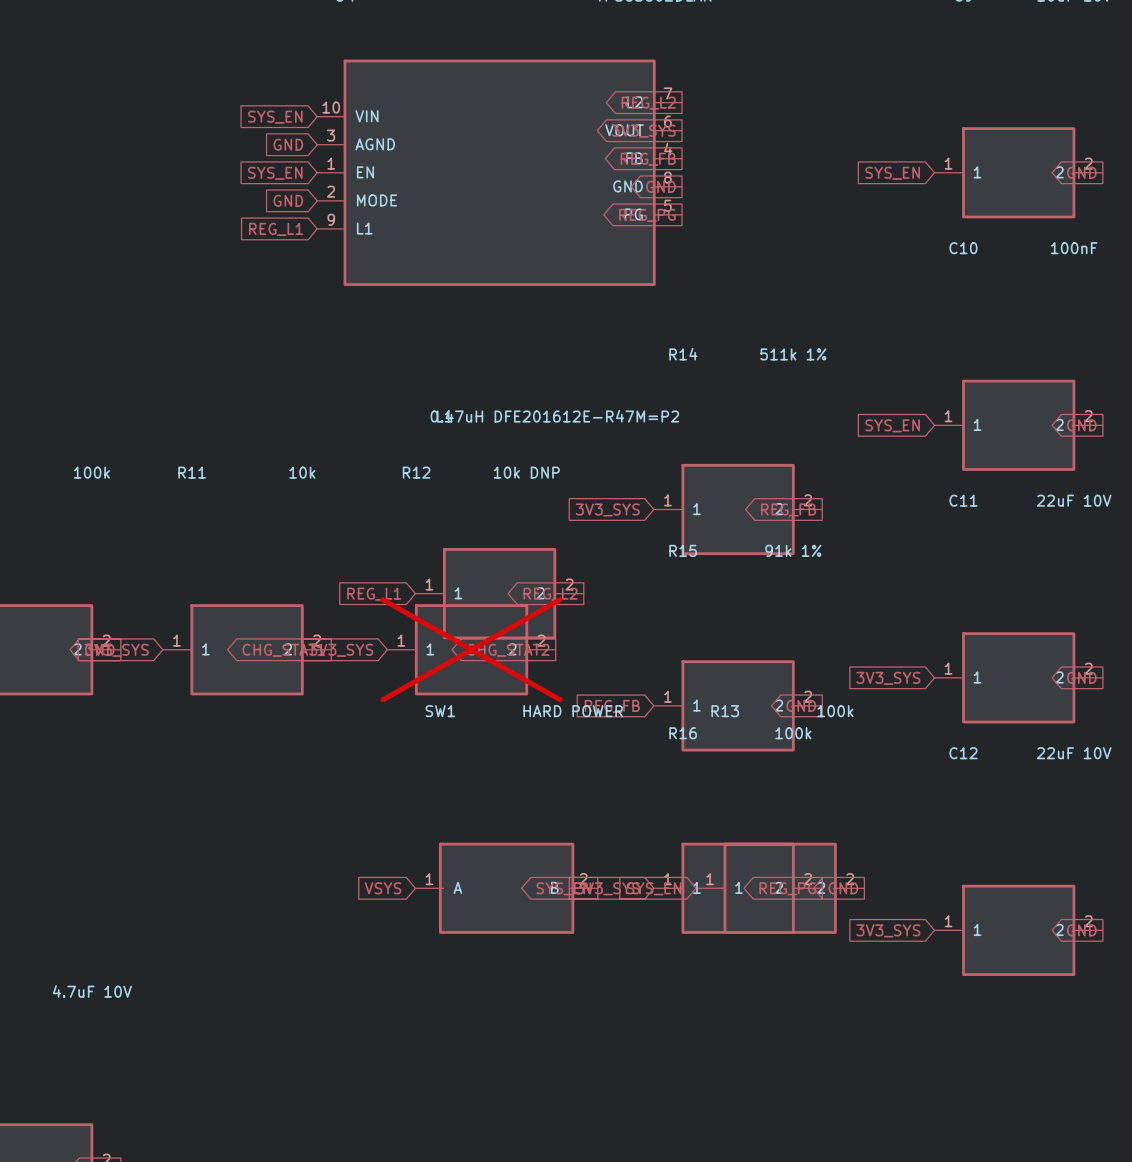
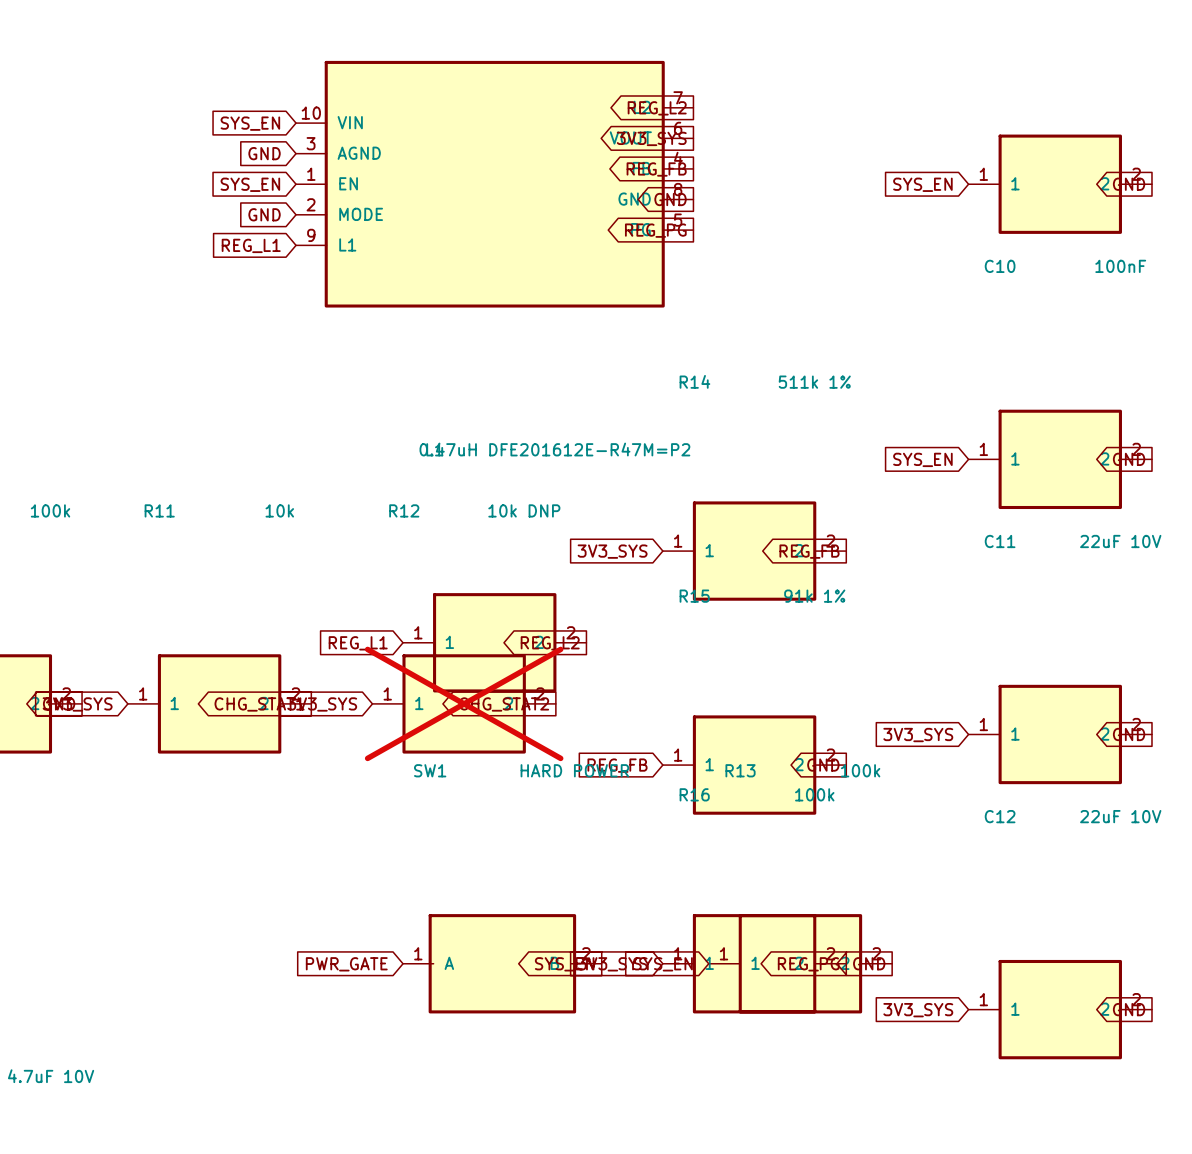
global label: VSYS (383, 888) -> PWR_GATE (346, 964)

